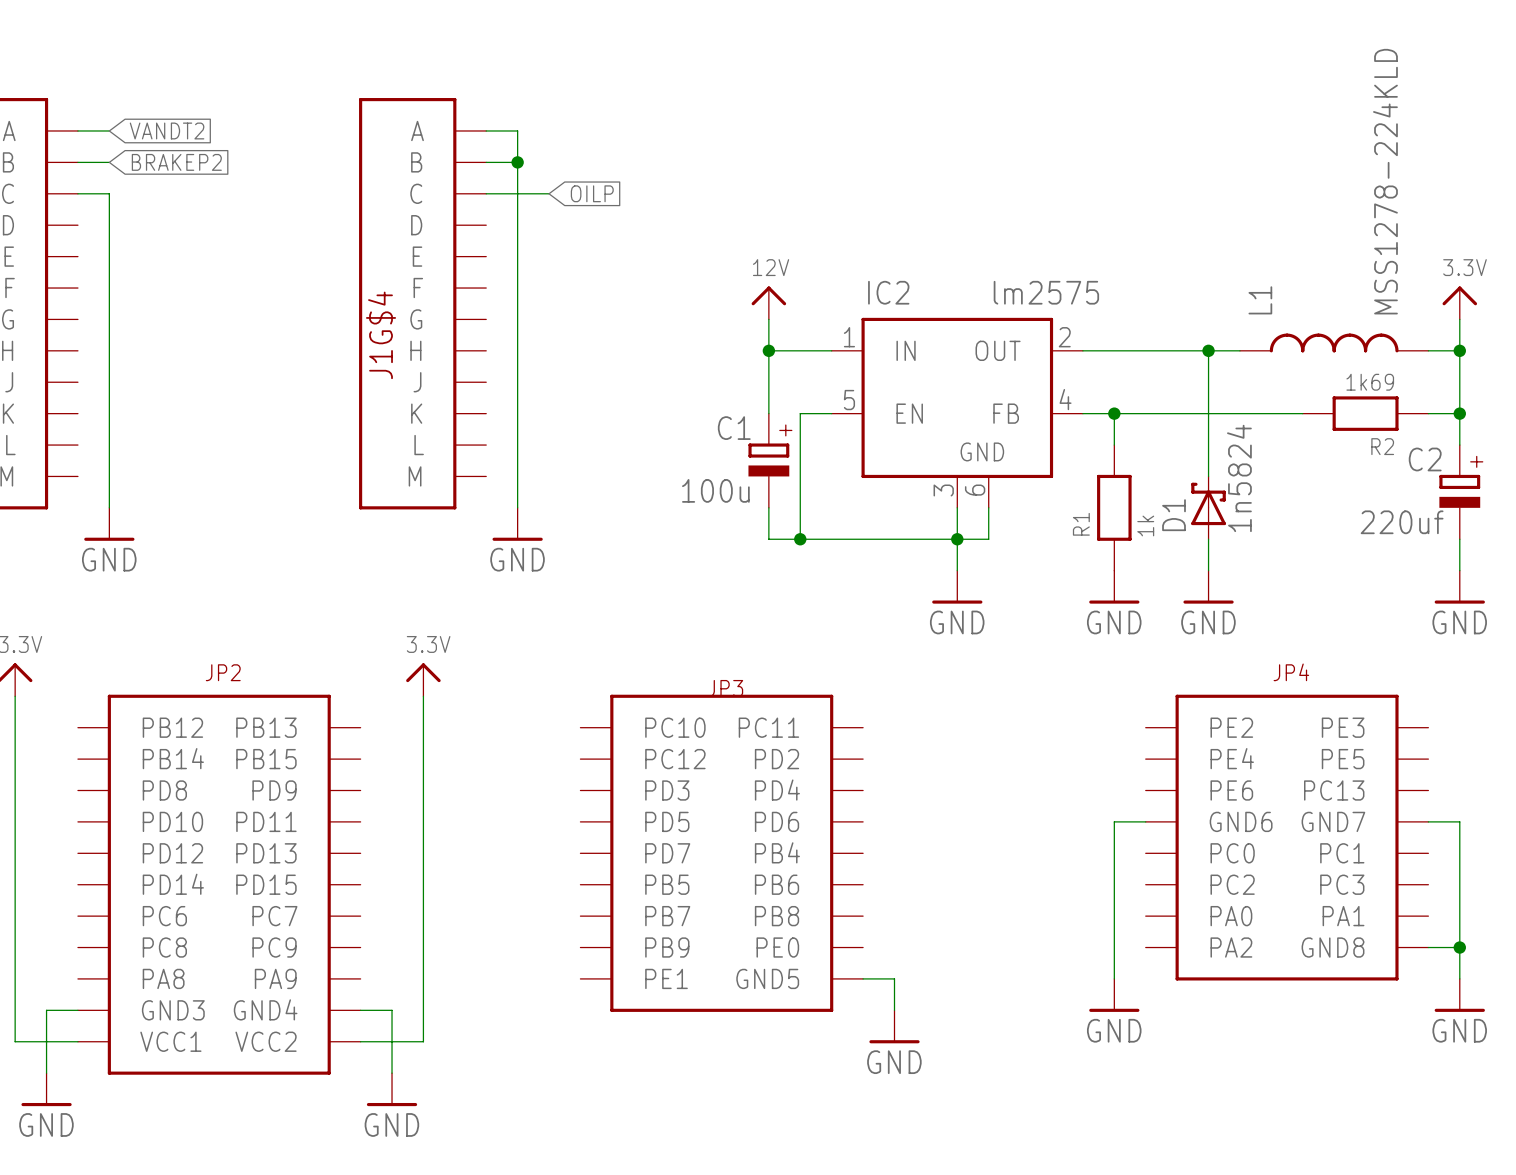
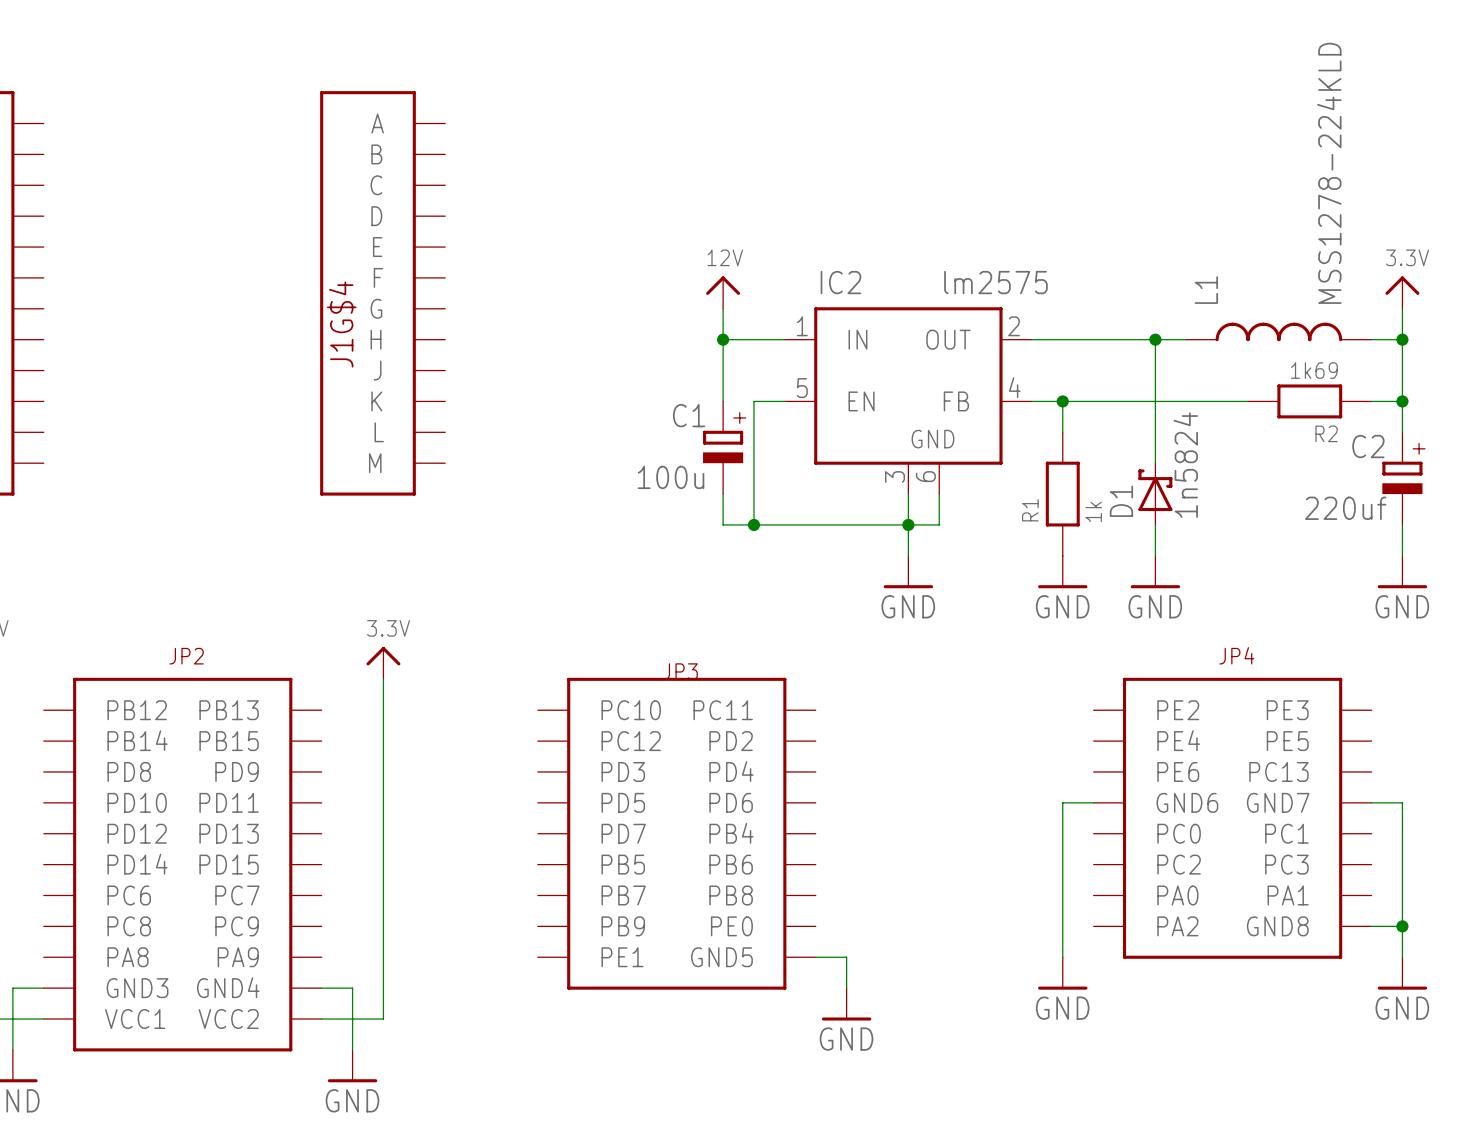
wire: (77, 130) (109, 130) -> none
global label: VANDT2 (167, 130) -> none
wire: (486, 130) (517, 130) (517, 507) -> none
wire: (77, 162) (109, 162) -> none
global label: BRAKEP2 (176, 162) -> none
wire: (486, 162) (517, 162) -> none
junction: (517, 162) -> none
wire: (77, 193) (109, 193) (109, 507) -> none
wire: (486, 193) (549, 193) -> none
global label: OILP (592, 193) -> none
power symbol: GND (109, 524) -> none
power symbol: GND (517, 524) -> none

